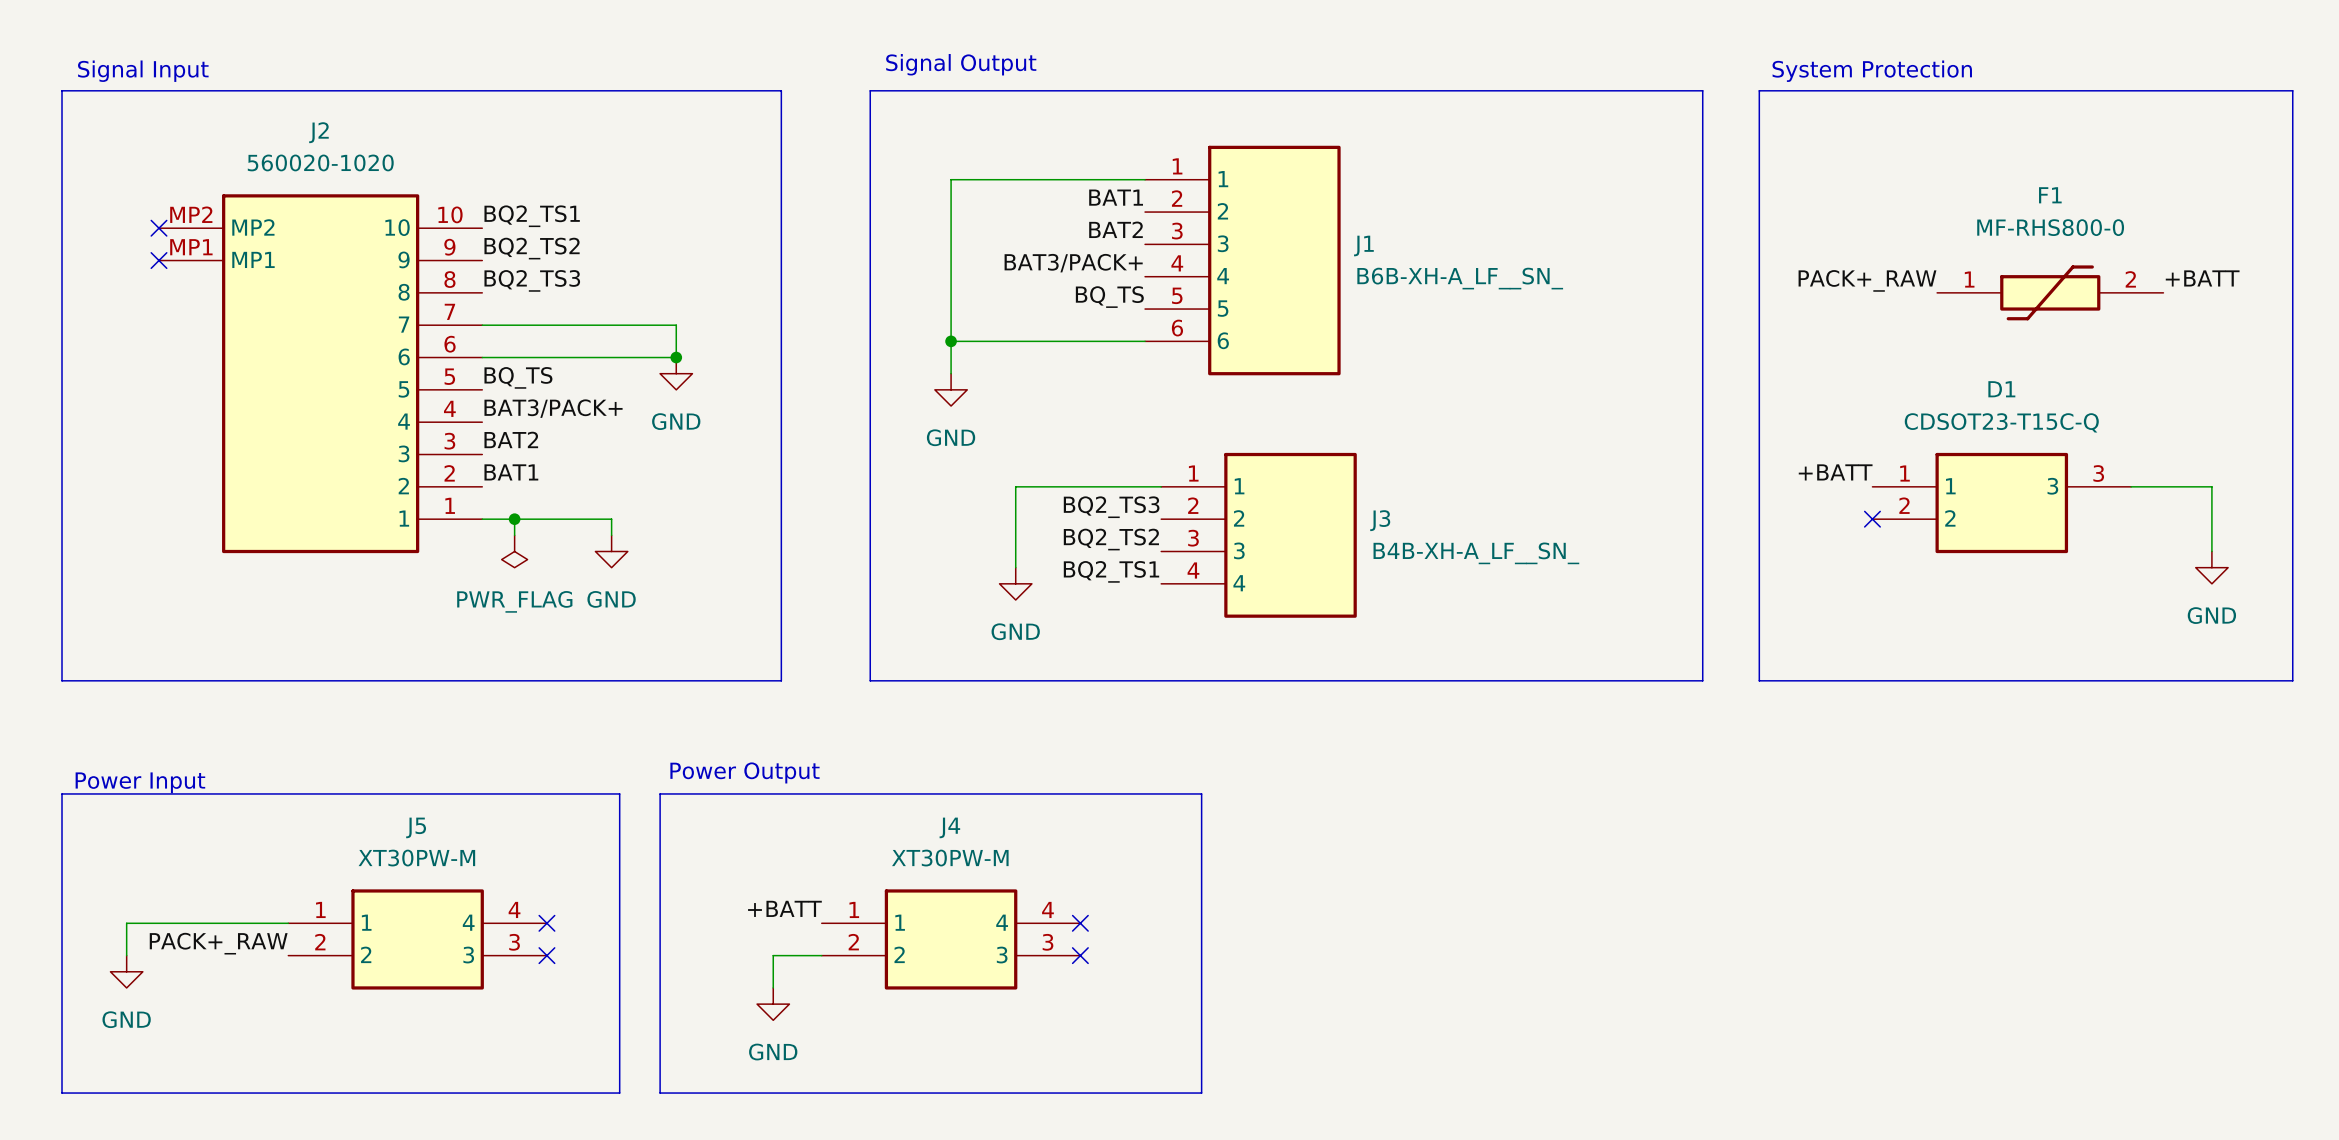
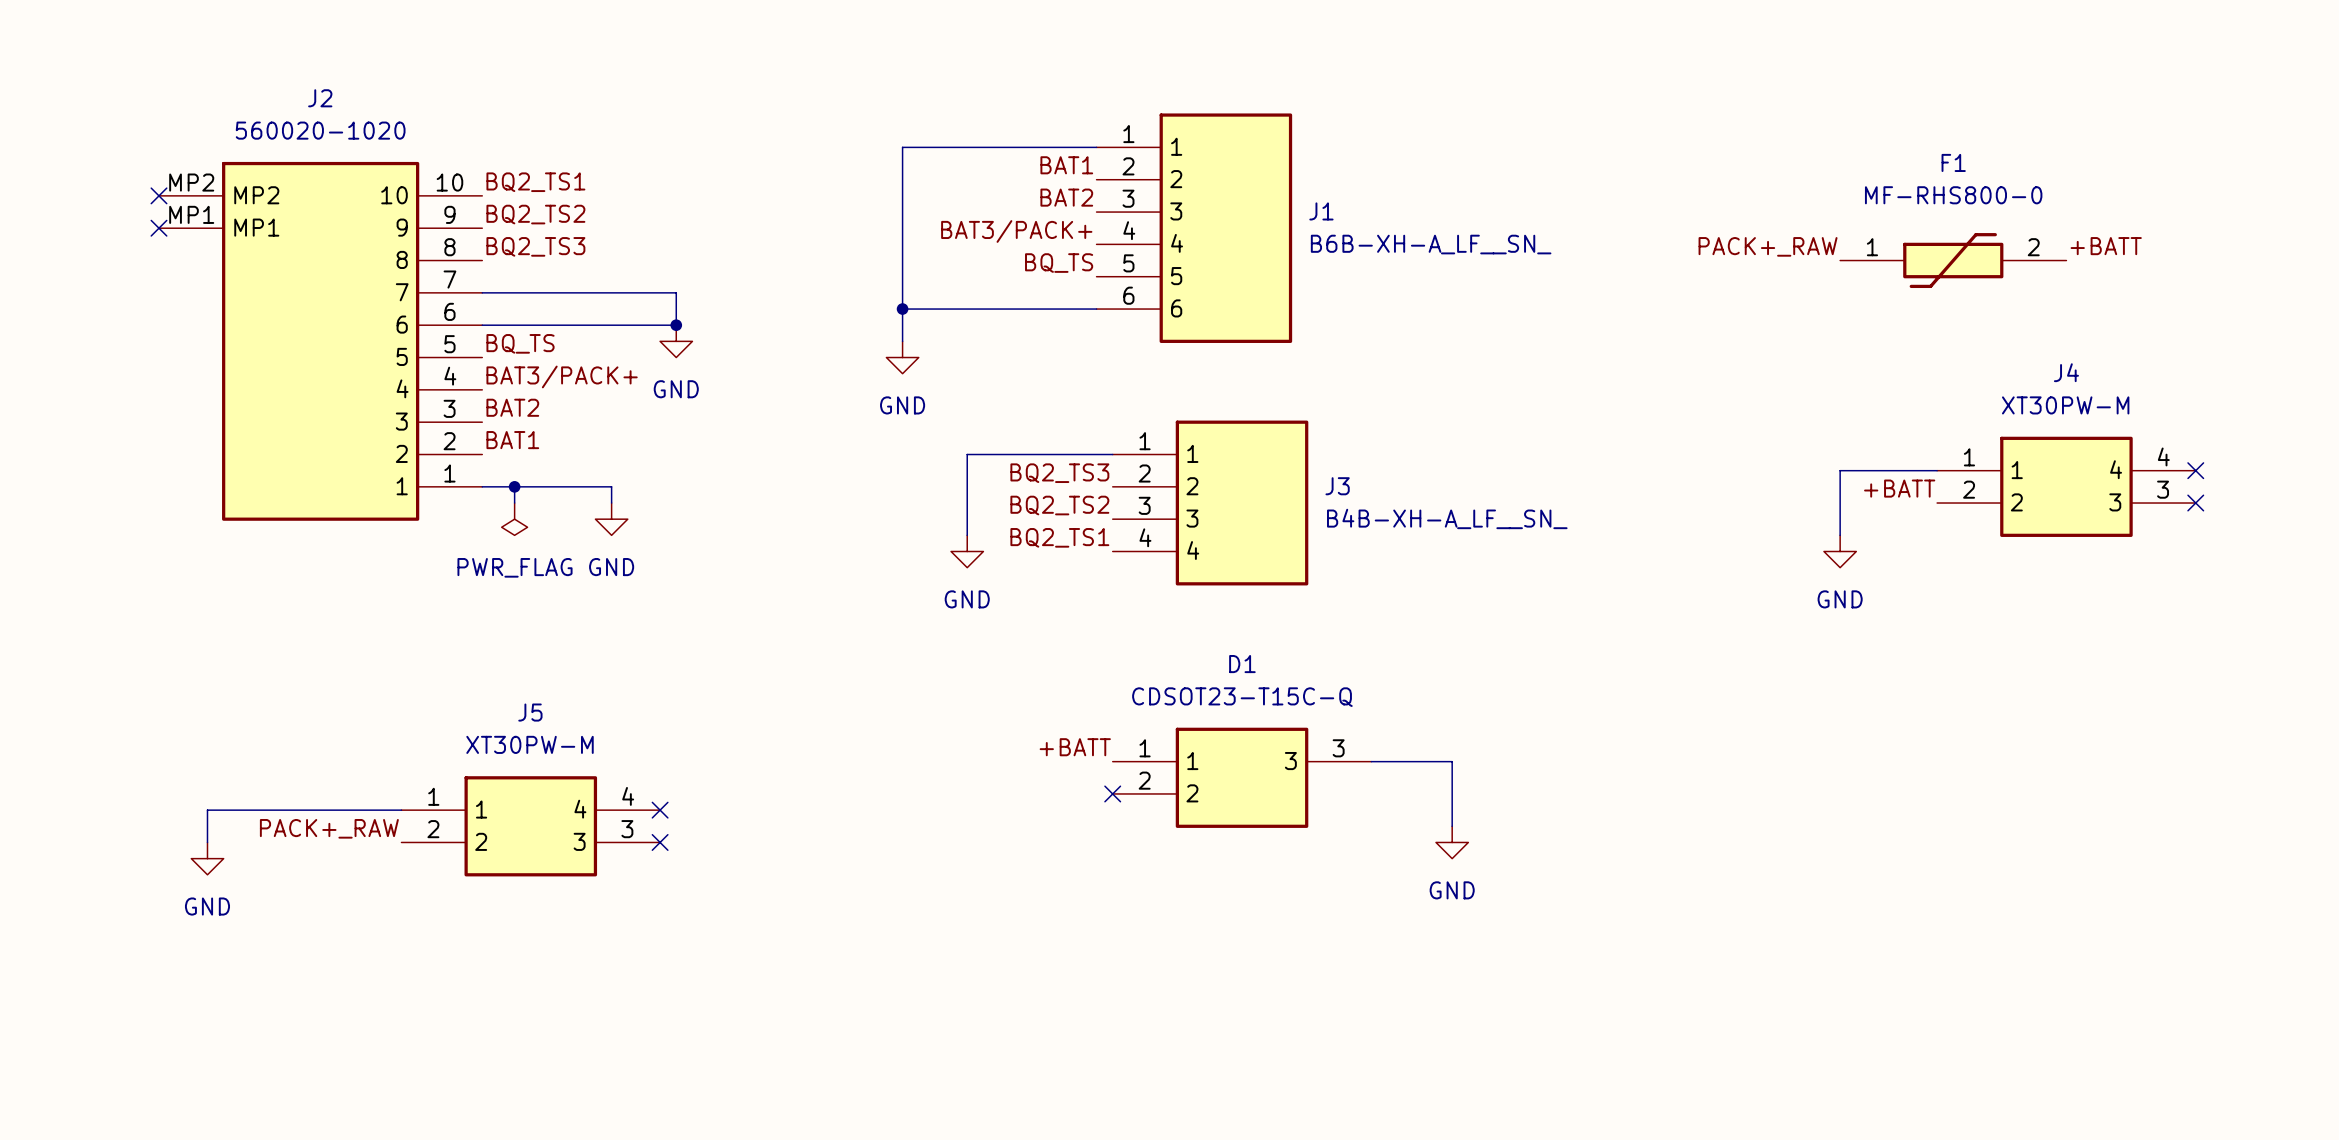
text: Signal Output (961, 64) -> none
text: Signal Input (143, 71) -> none
text: System Protection (1872, 71) -> none
line: (62, 90) (62, 680) (781, 680) (781, 90) (62, 90) -> none
line: (870, 90) (1702, 90) (1702, 680) (870, 680) (870, 90) -> none
line: (1759, 90) (2292, 90) (2292, 680) (1759, 680) (1759, 90) -> none
wire: (1145, 179) (951, 179) (951, 373) -> (1096, 147) (902, 147) (902, 341)
label: none -> BQ2_TS1 (535, 182)
label position: BAT1 (1116, 197) -> BAT1 (1066, 165)
label: BQ2_TS1 (532, 216) -> BQ2_TS2 (535, 214)
label position: BAT2 (1116, 229) -> BAT2 (1066, 197)
label: BQ2_TS2 (532, 248) -> BQ2_TS3 (535, 246)
no-connect mark position: (158, 260) -> (158, 195)
J1 position: (1242, 260) -> (1194, 228)
label position: BAT3/PACK+ (1073, 263) -> BAT3/PACK+ (1016, 231)
label position: +BATT (2202, 278) -> +BATT (2106, 246)
label: BQ2_TS3 (532, 280) -> none
label position: PACK+_RAW (1867, 280) -> PACK+_RAW (1768, 246)
F1 position: (2050, 292) -> (1953, 260)
label position: BQ_TS (1109, 297) -> BQ_TS (1059, 263)
wire: (676, 325) (676, 357) (482, 357) -> (676, 325) (676, 292) (482, 292)
wire: (951, 341) (1145, 341) -> (902, 309) (1096, 309)
junction position: (951, 341) -> (902, 309)
label: none -> BQ_TS (520, 343)
junction position: (676, 357) -> (676, 325)
J2 position: (320, 373) -> (320, 341)
power symbol position: GND (676, 373) -> GND (676, 341)
label: BQ_TS (518, 377) -> BAT3/PACK+ (562, 376)
power symbol position: GND (951, 389) -> GND (902, 357)
label: BAT3/PACK+ (553, 408) -> BAT2 (512, 407)
label: BAT2 (511, 439) -> BAT1 (512, 440)
wire: none -> (1937, 470) (1840, 470) (1840, 535)
no-connect mark: none -> (2195, 470)
label: BAT1 (511, 472) -> none
label position: +BATT (1835, 472) -> +BATT (1899, 488)
wire: (1161, 486) (1015, 486) (1015, 567) -> (1112, 454) (967, 454) (967, 535)
wire: (2131, 486) (2211, 486) (2211, 551) -> none
D1 position: (2001, 503) -> (1242, 777)
no-connect mark: none -> (2195, 503)
label position: BQ2_TS3 (1111, 507) -> BQ2_TS3 (1059, 473)
wire: (482, 519) (611, 519) (611, 535) -> (482, 486) (611, 486) (611, 503)
wire: (514, 519) (514, 535) -> (514, 486) (514, 503)
junction position: (514, 519) -> (514, 486)
no-connect mark: (1872, 519) -> none
J3 position: (1259, 535) -> (1210, 503)
label position: BQ2_TS2 (1111, 539) -> BQ2_TS2 (1059, 505)
power symbol position: PWR_FLAG (514, 551) -> PWR_FLAG (514, 519)
power symbol position: GND (611, 551) -> GND (611, 519)
power symbol: none -> GND (1840, 551)
power symbol: GND (2211, 567) -> none
label position: BQ2_TS1 (1111, 571) -> BQ2_TS1 (1059, 537)
power symbol position: GND (1015, 583) -> GND (967, 551)
label: none -> +BATT (1075, 747)
wire: none -> (1371, 761) (1452, 761) (1452, 826)
text: Power Output (744, 772) -> none
text: Power Input (140, 782) -> none
line: (62, 793) (619, 793) (619, 1093) (62, 1093) (62, 793) -> none
line: (660, 793) (1201, 793) (1201, 1093) (660, 1093) (660, 793) -> none
no-connect mark: none -> (1112, 793)
wire: none -> (401, 810) (207, 810) (207, 842)
no-connect mark: none -> (660, 810)
no-connect mark: none -> (660, 842)
power symbol: none -> GND (1452, 842)
label: +BATT (784, 908) -> none
wire: (288, 923) (126, 923) (126, 955) -> none
no-connect mark: (546, 923) -> none
no-connect mark: (1080, 923) -> none
J5 position: (417, 939) -> (530, 826)
J4 position: (951, 939) -> (2066, 486)
label position: PACK+_RAW (218, 943) -> PACK+_RAW (329, 828)
no-connect mark: (546, 955) -> none
wire: (821, 955) (773, 955) (773, 987) -> none
no-connect mark: (1080, 955) -> none
power symbol position: GND (126, 971) -> GND (207, 858)
power symbol: GND (773, 1004) -> none

